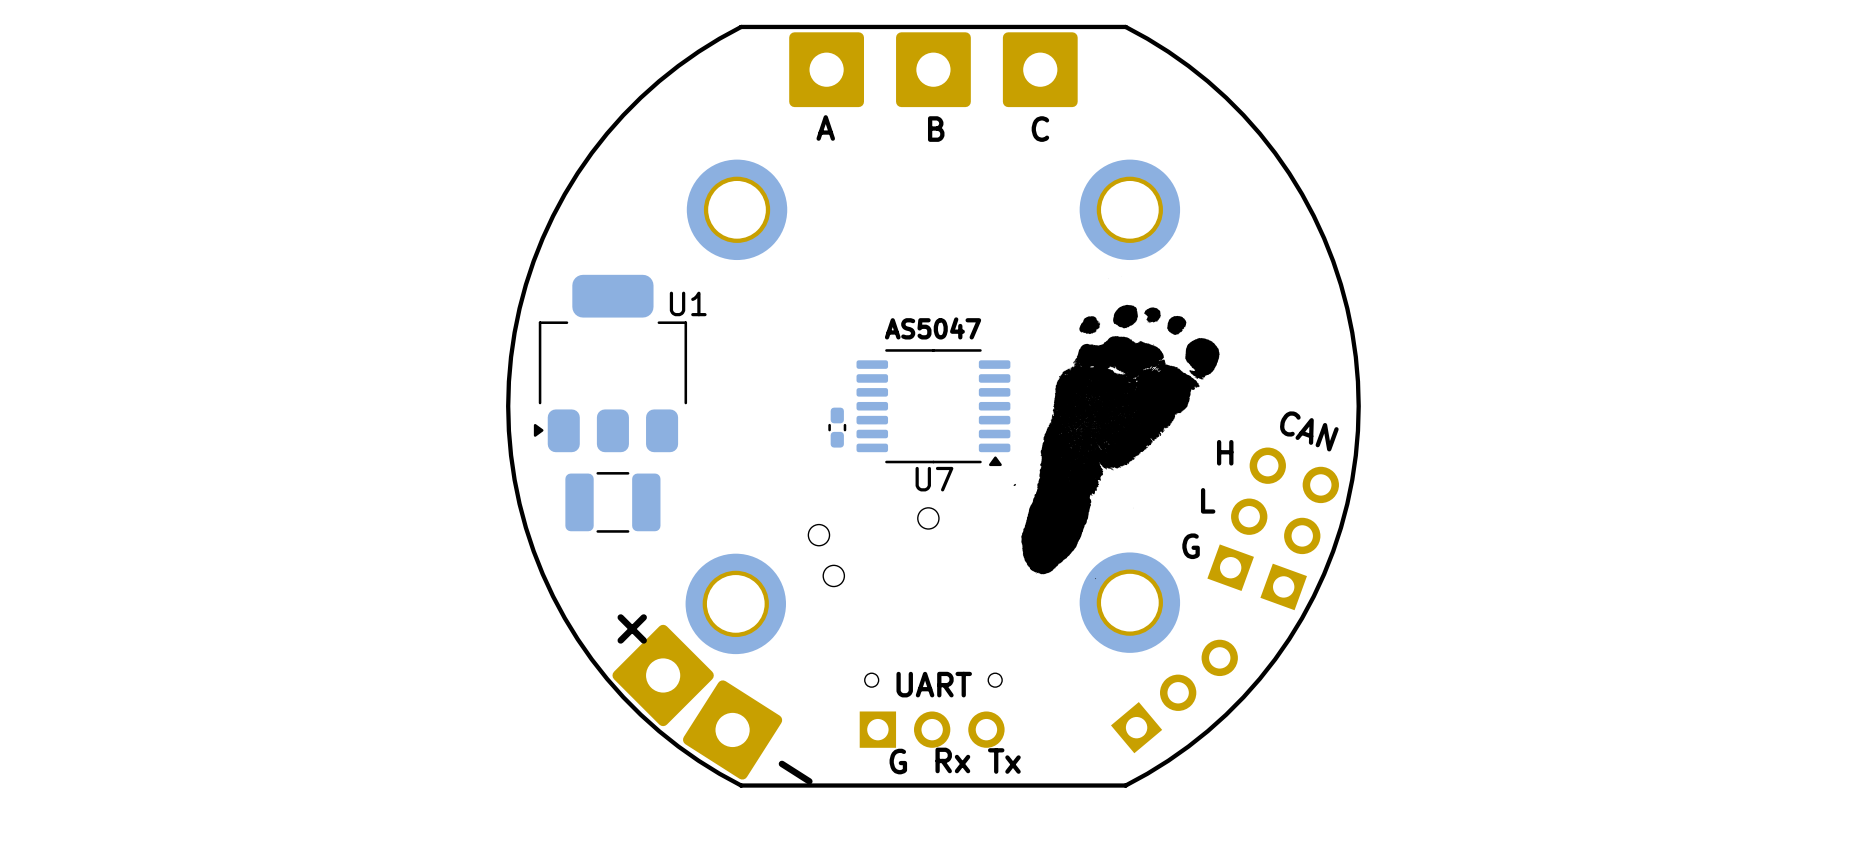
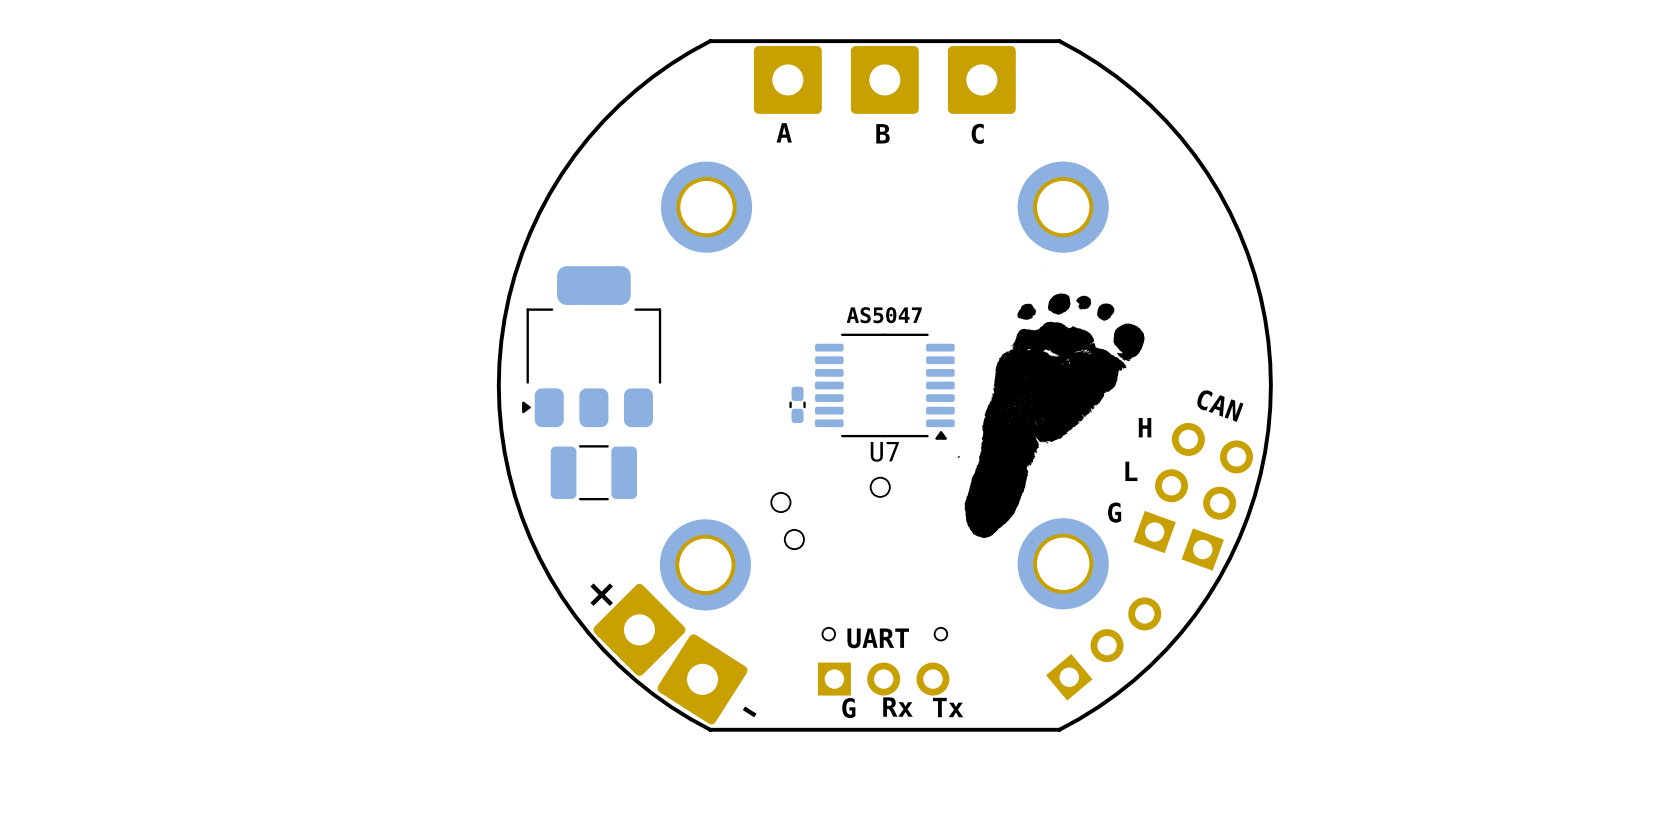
U1 name: U1 (688, 303) -> none

